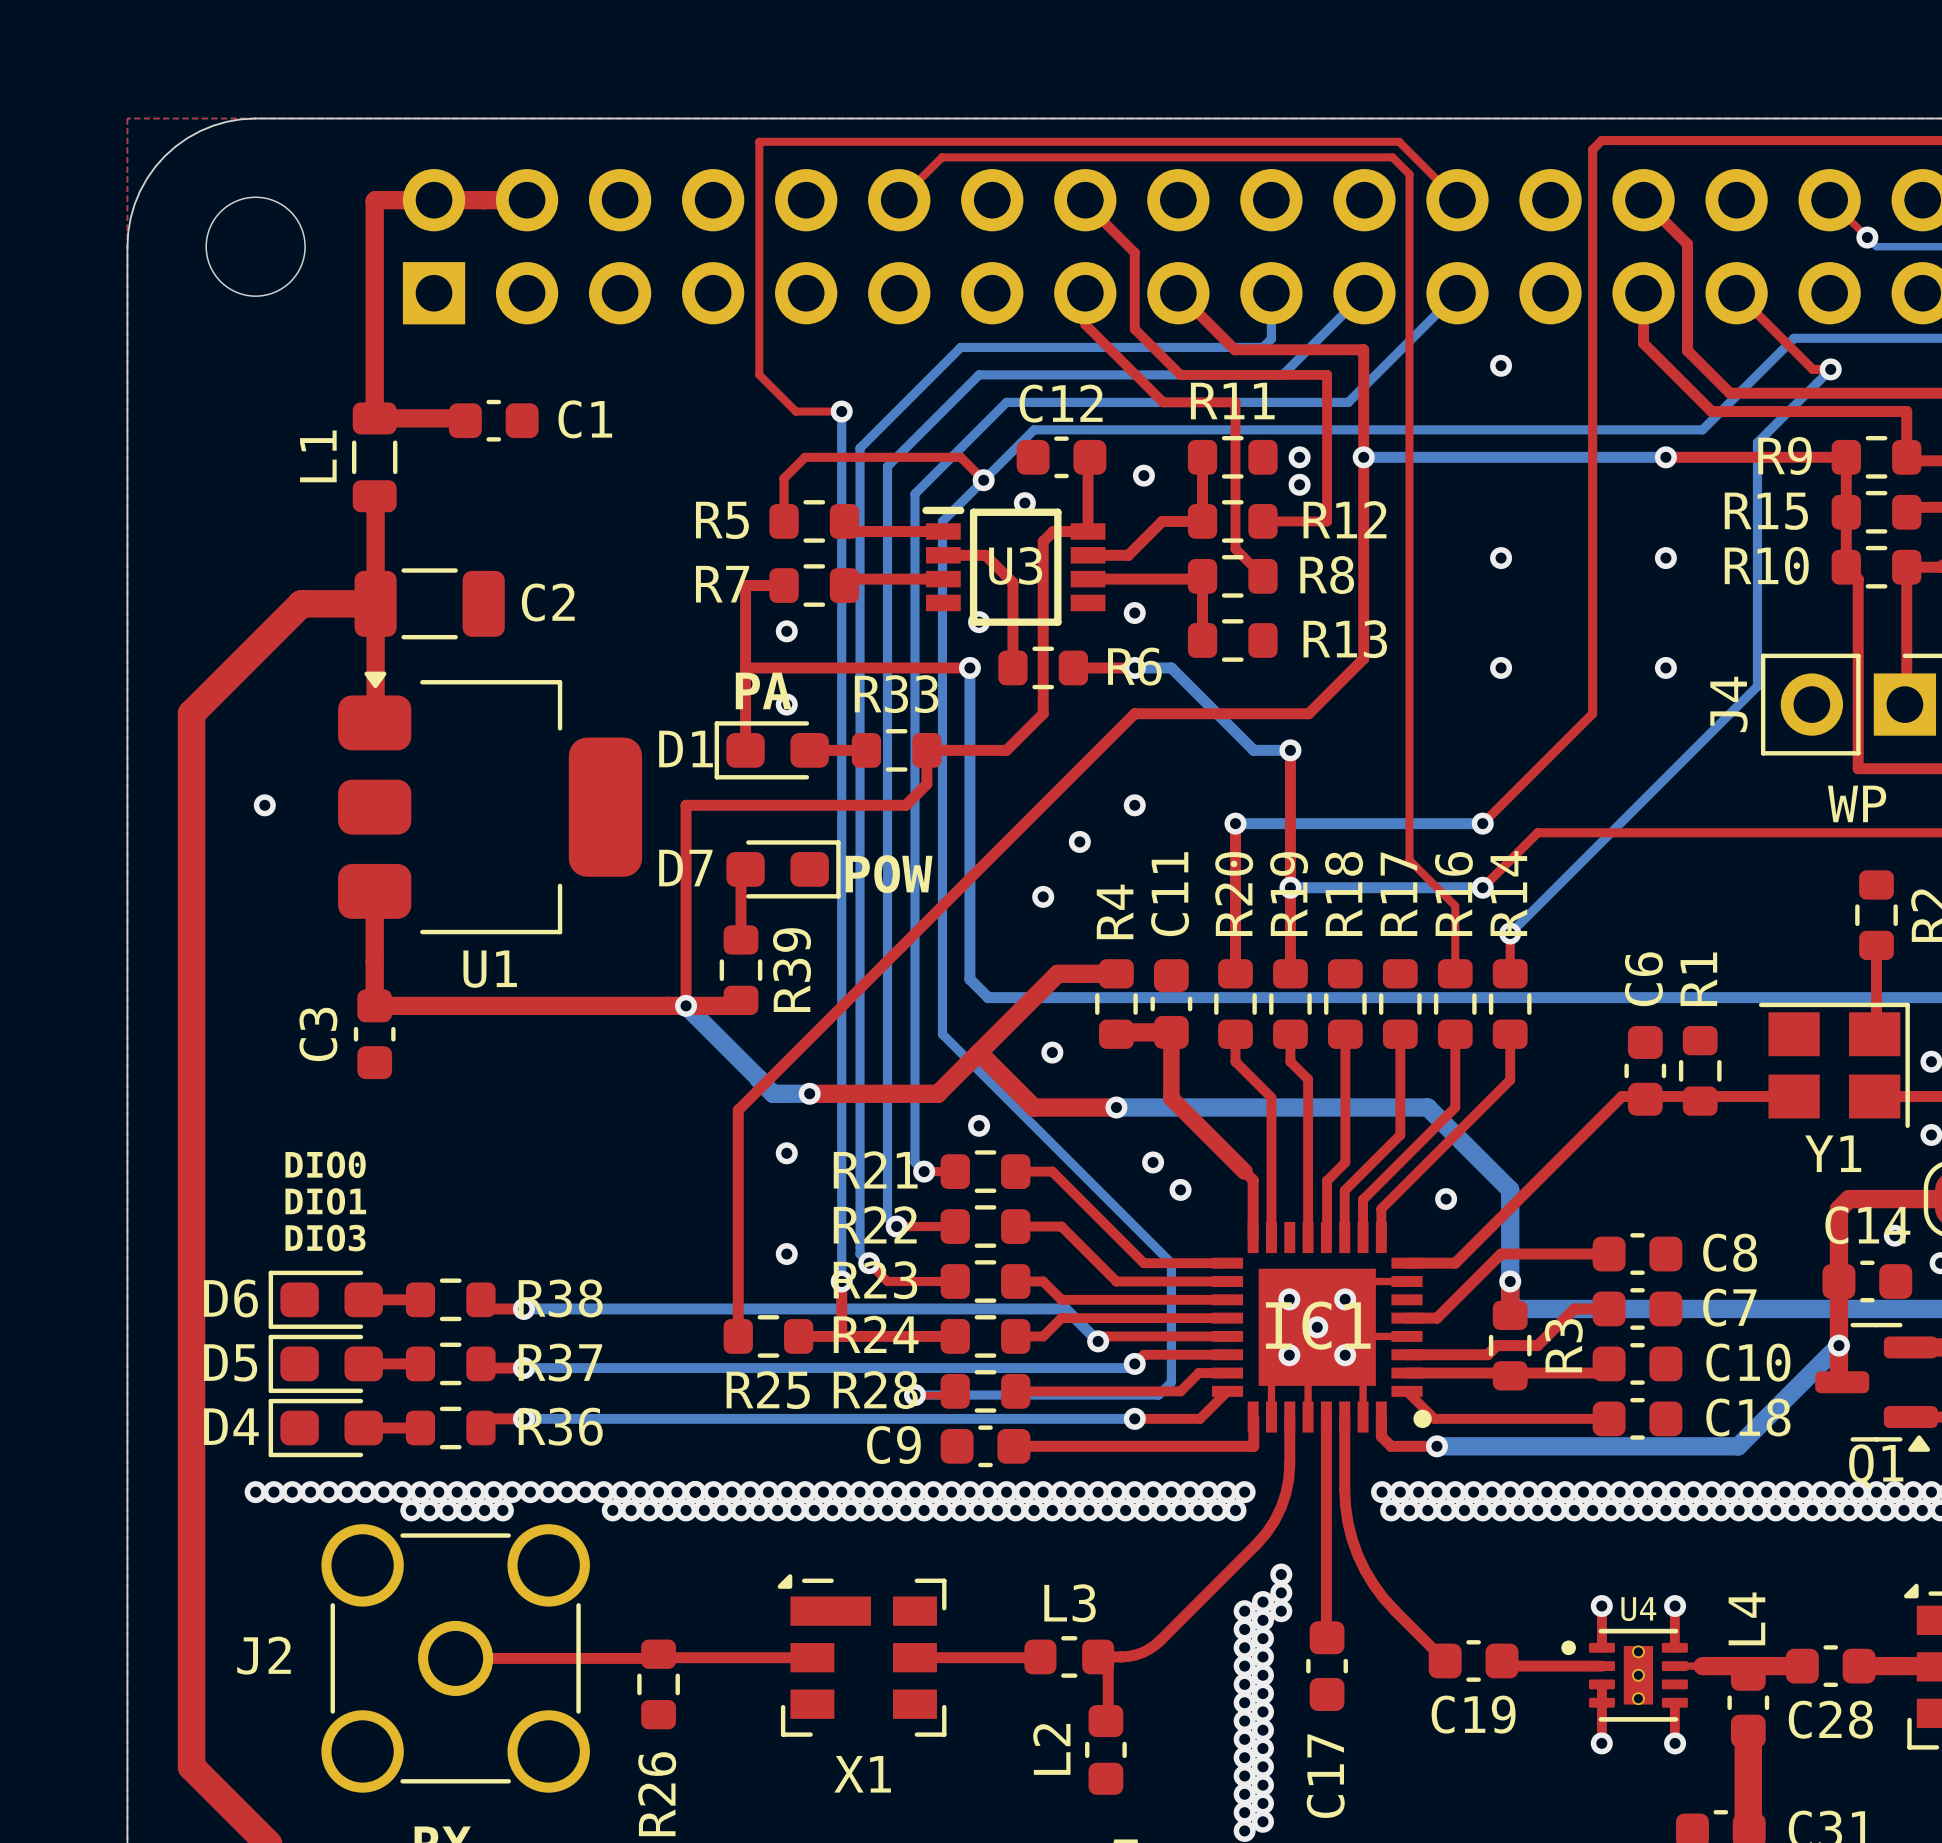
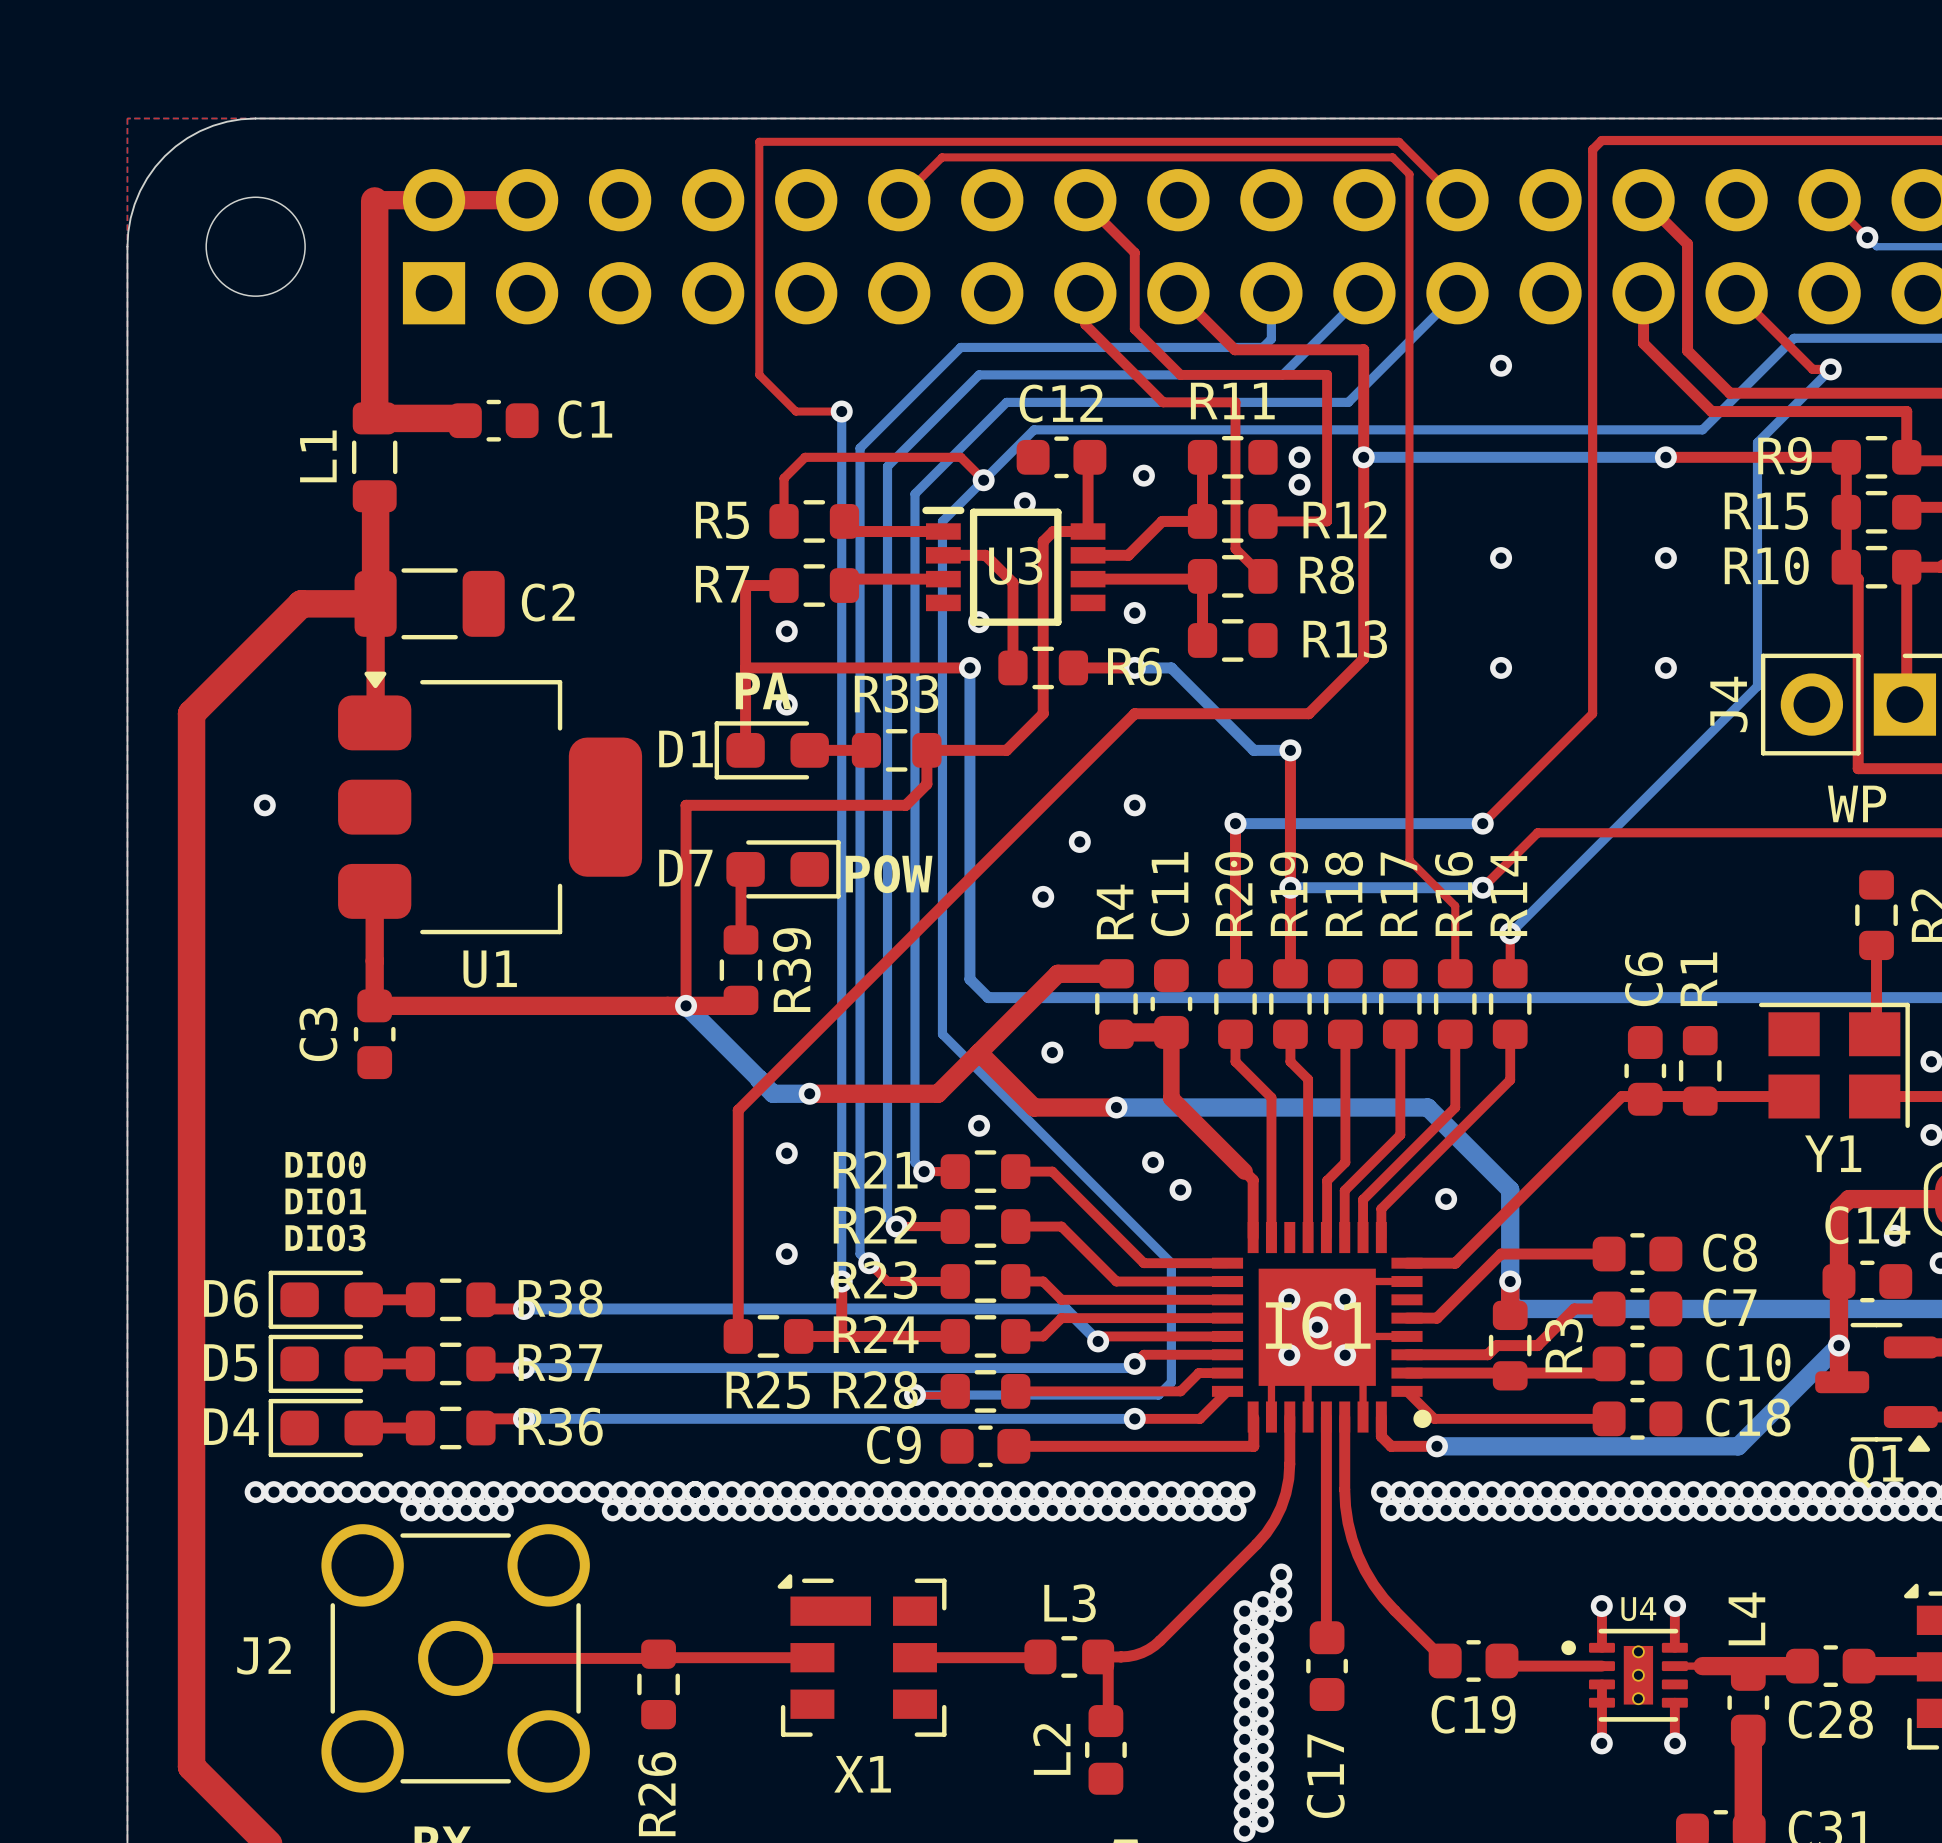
top track width: thin (374, 200) (374, 418) (463, 418) -> thick (374, 200) (374, 418) (463, 418)
top track width: thin (375, 497) (375, 603) -> thick (375, 497) (375, 603)

